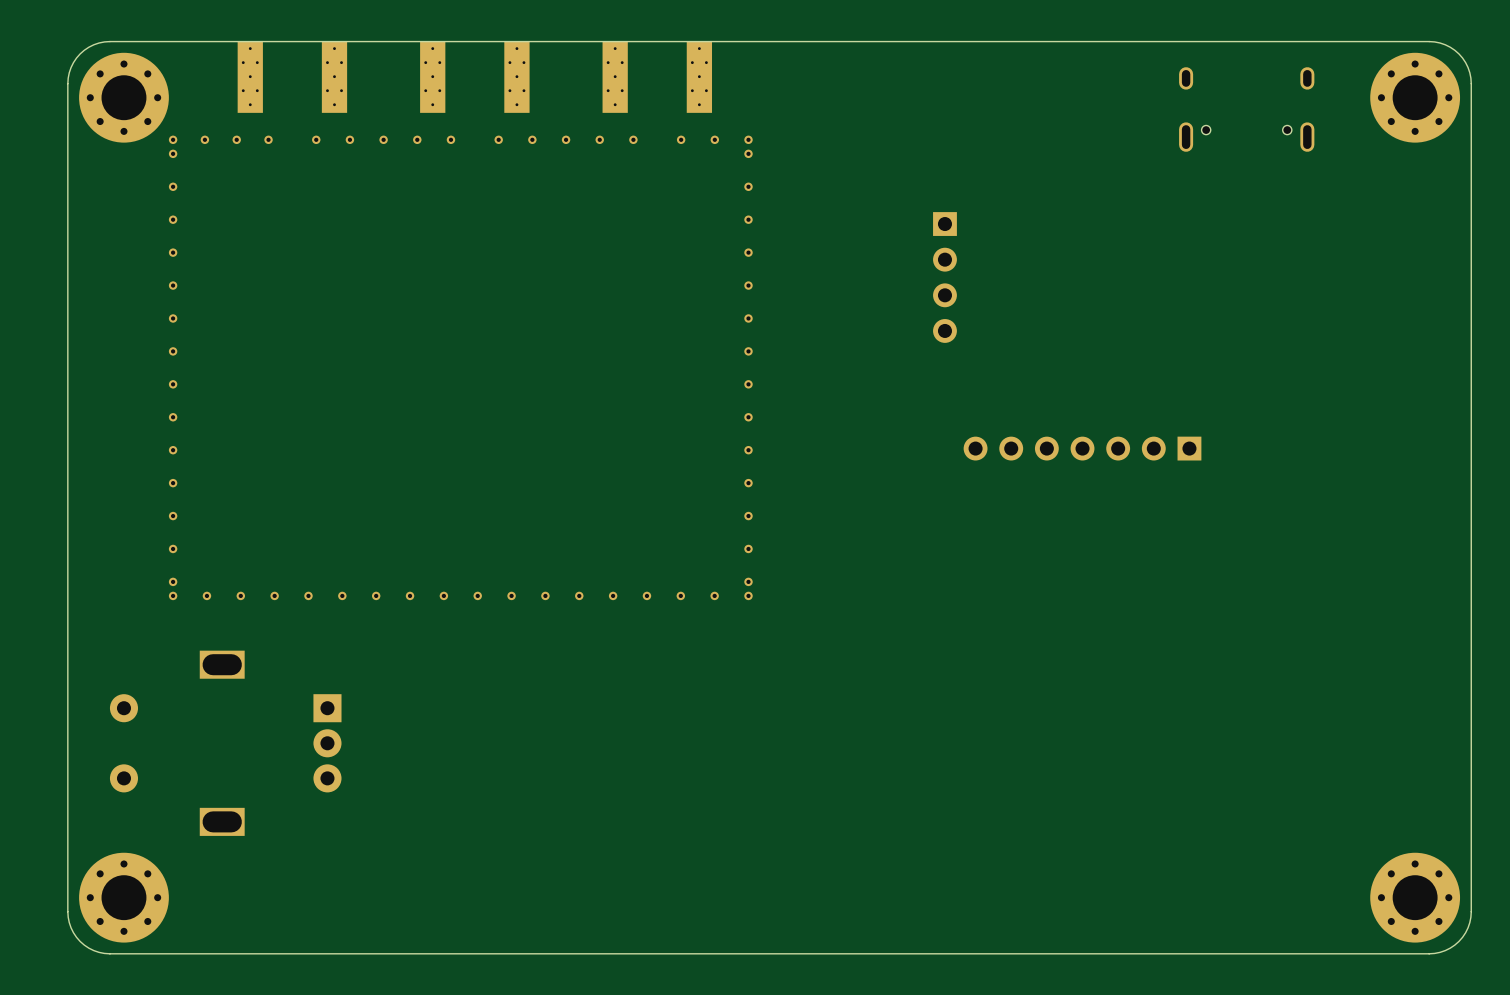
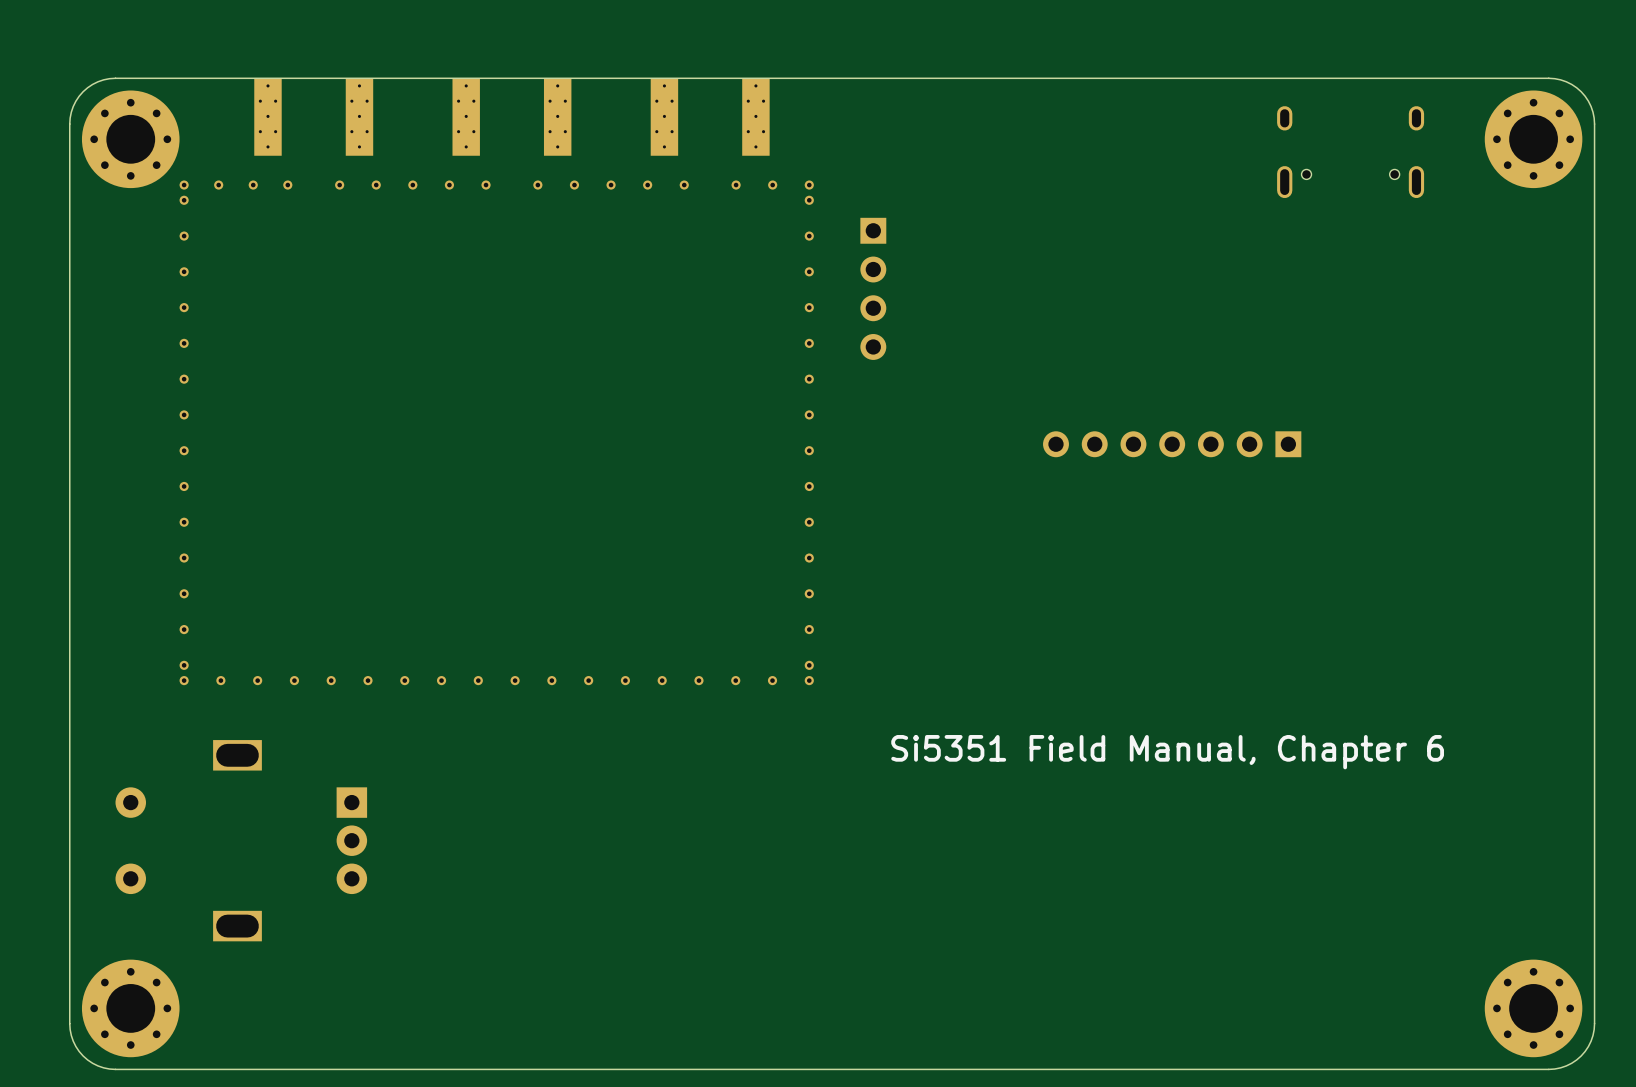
part position: (944, 277) -> (873, 288)
part position: (1082, 448) -> (1172, 444)
text: none -> Si5351 Field Manual, Chapter 6 (1167, 752)

